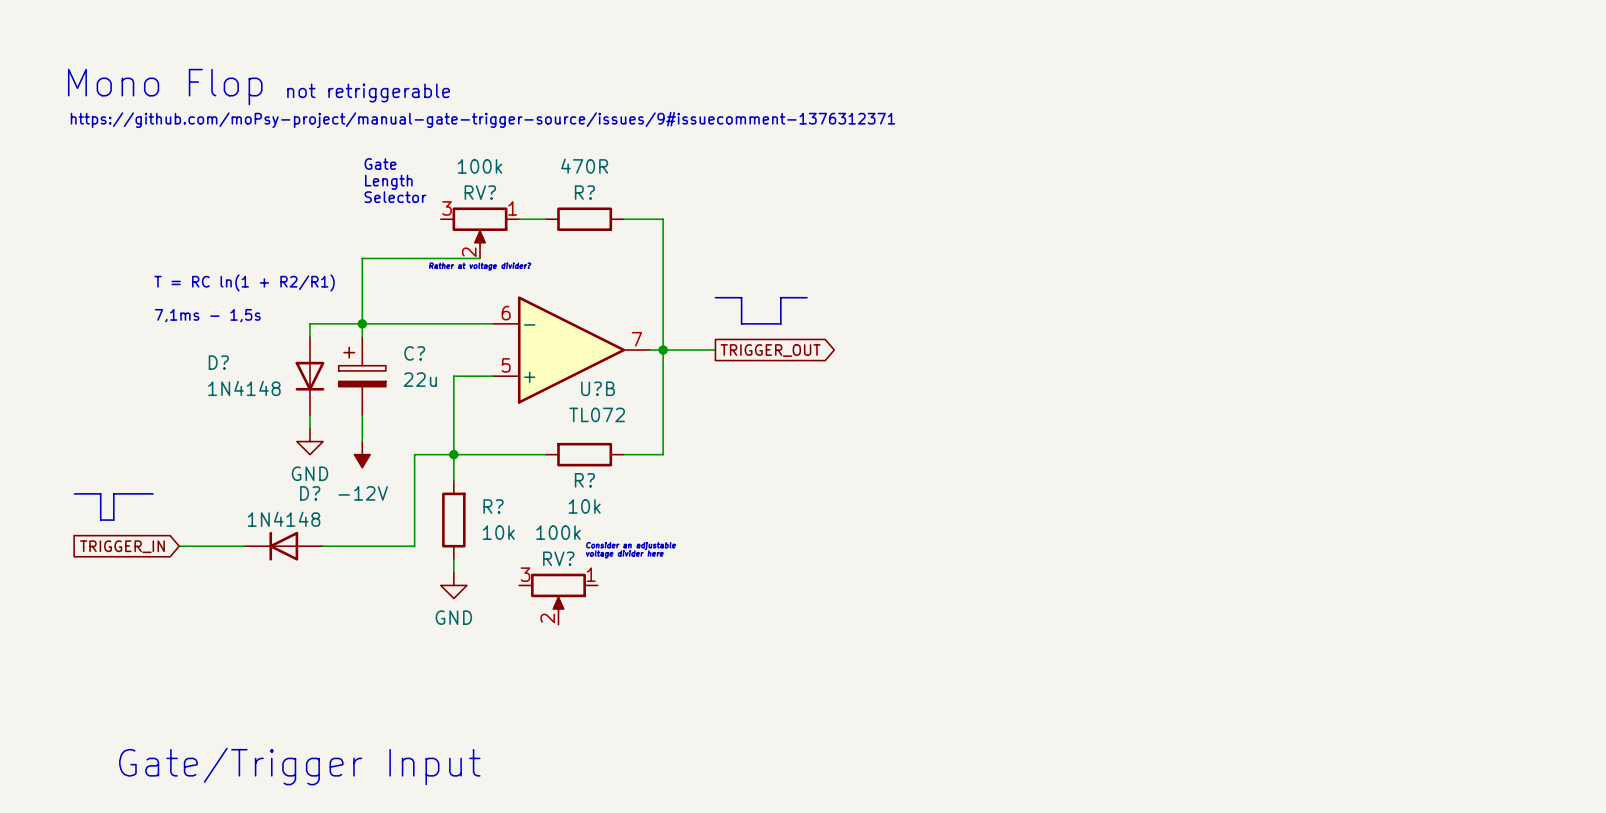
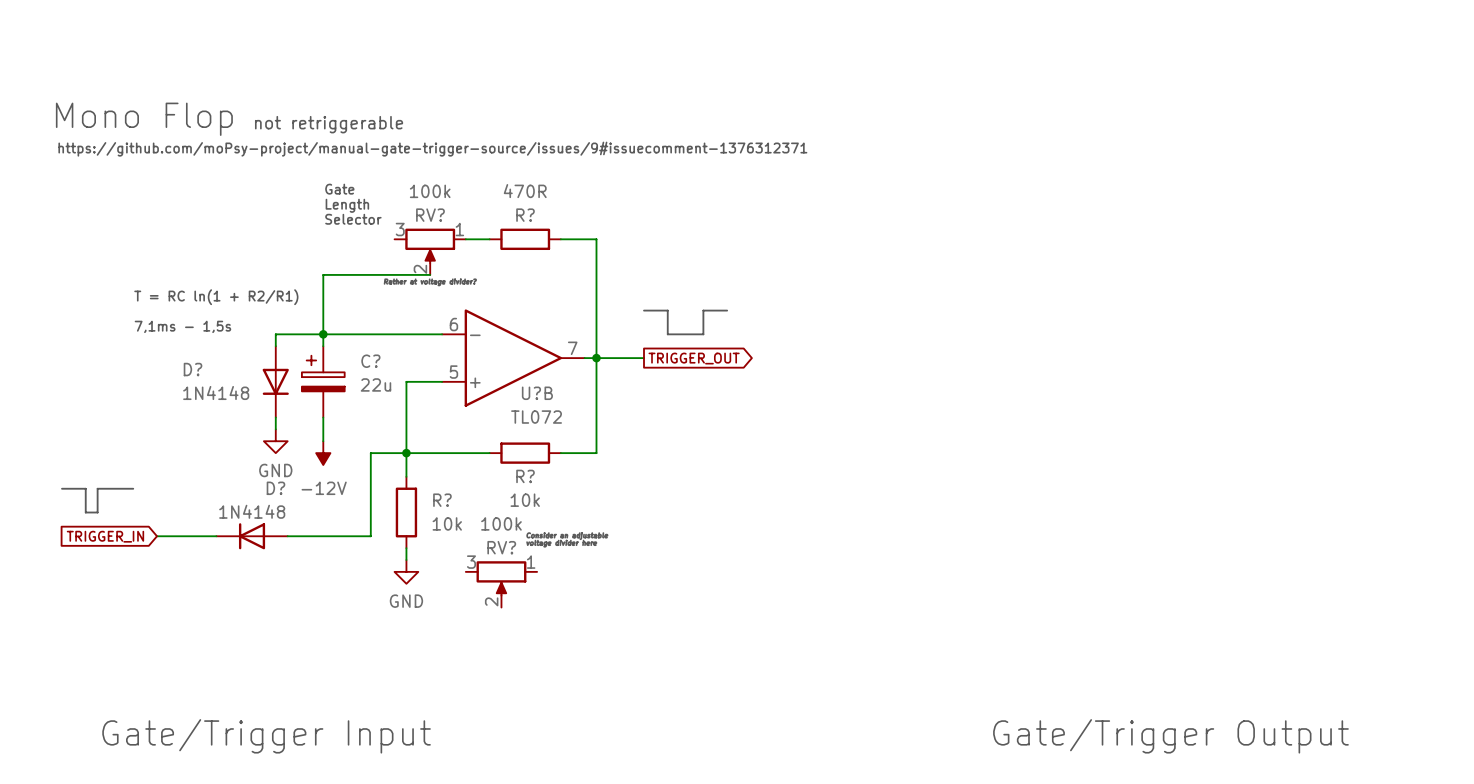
text: none -> Gate/Trigger Output (1170, 736)

